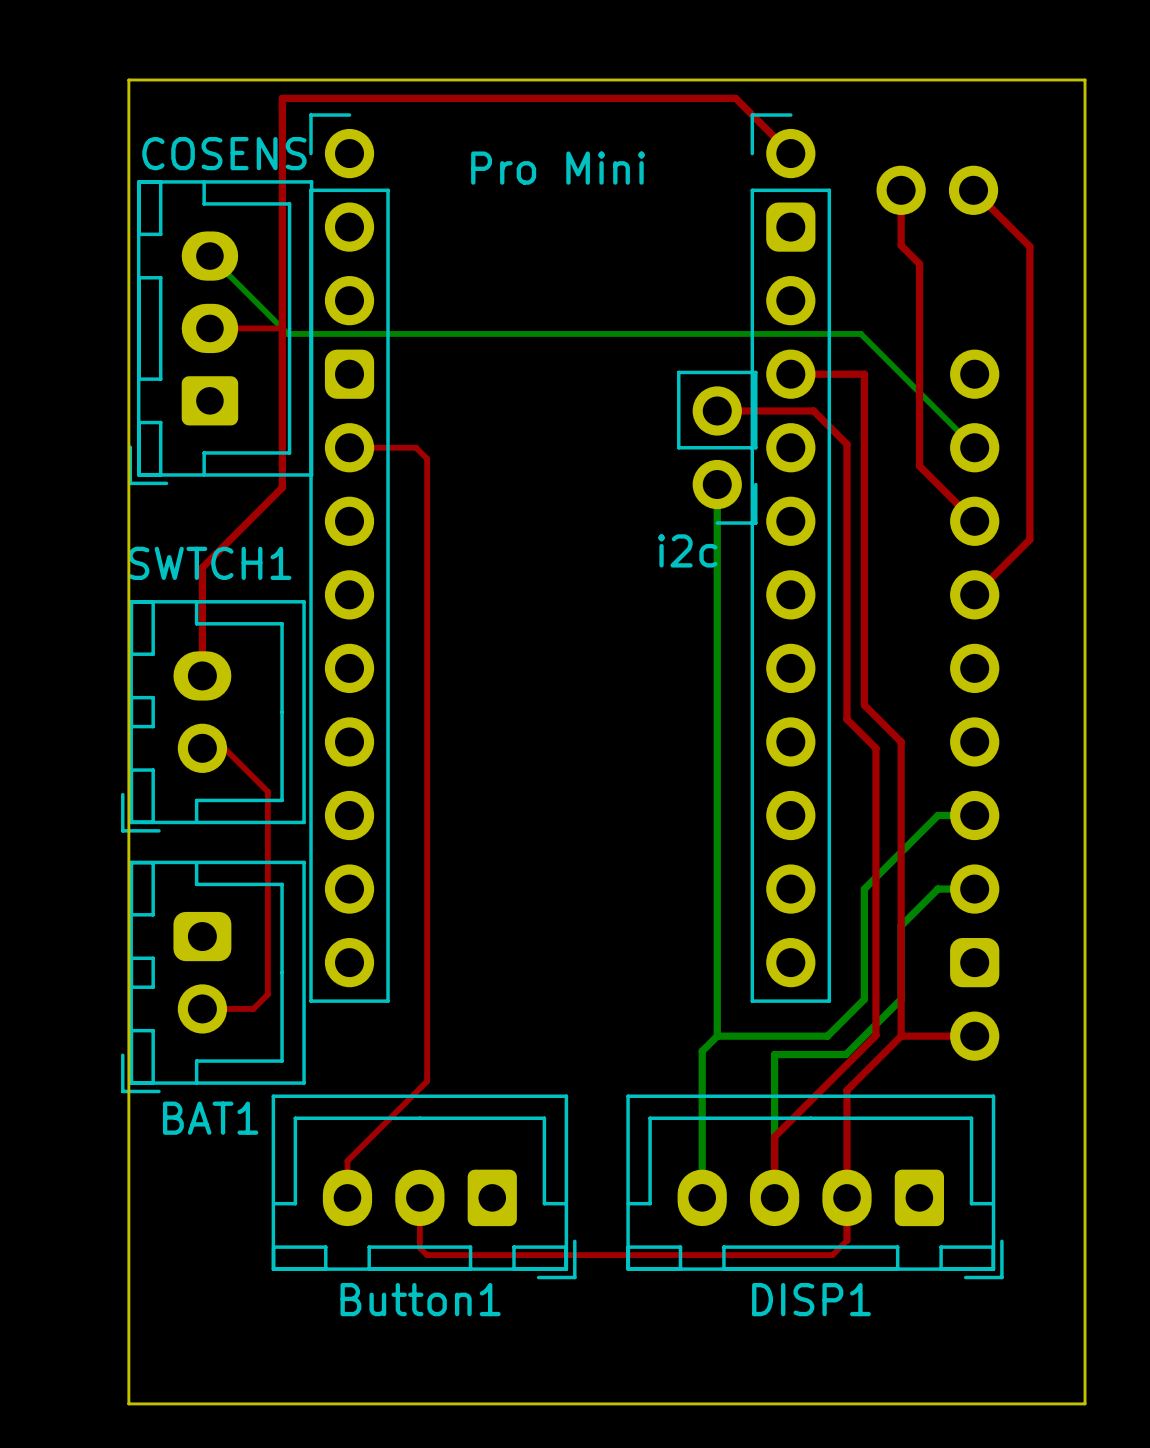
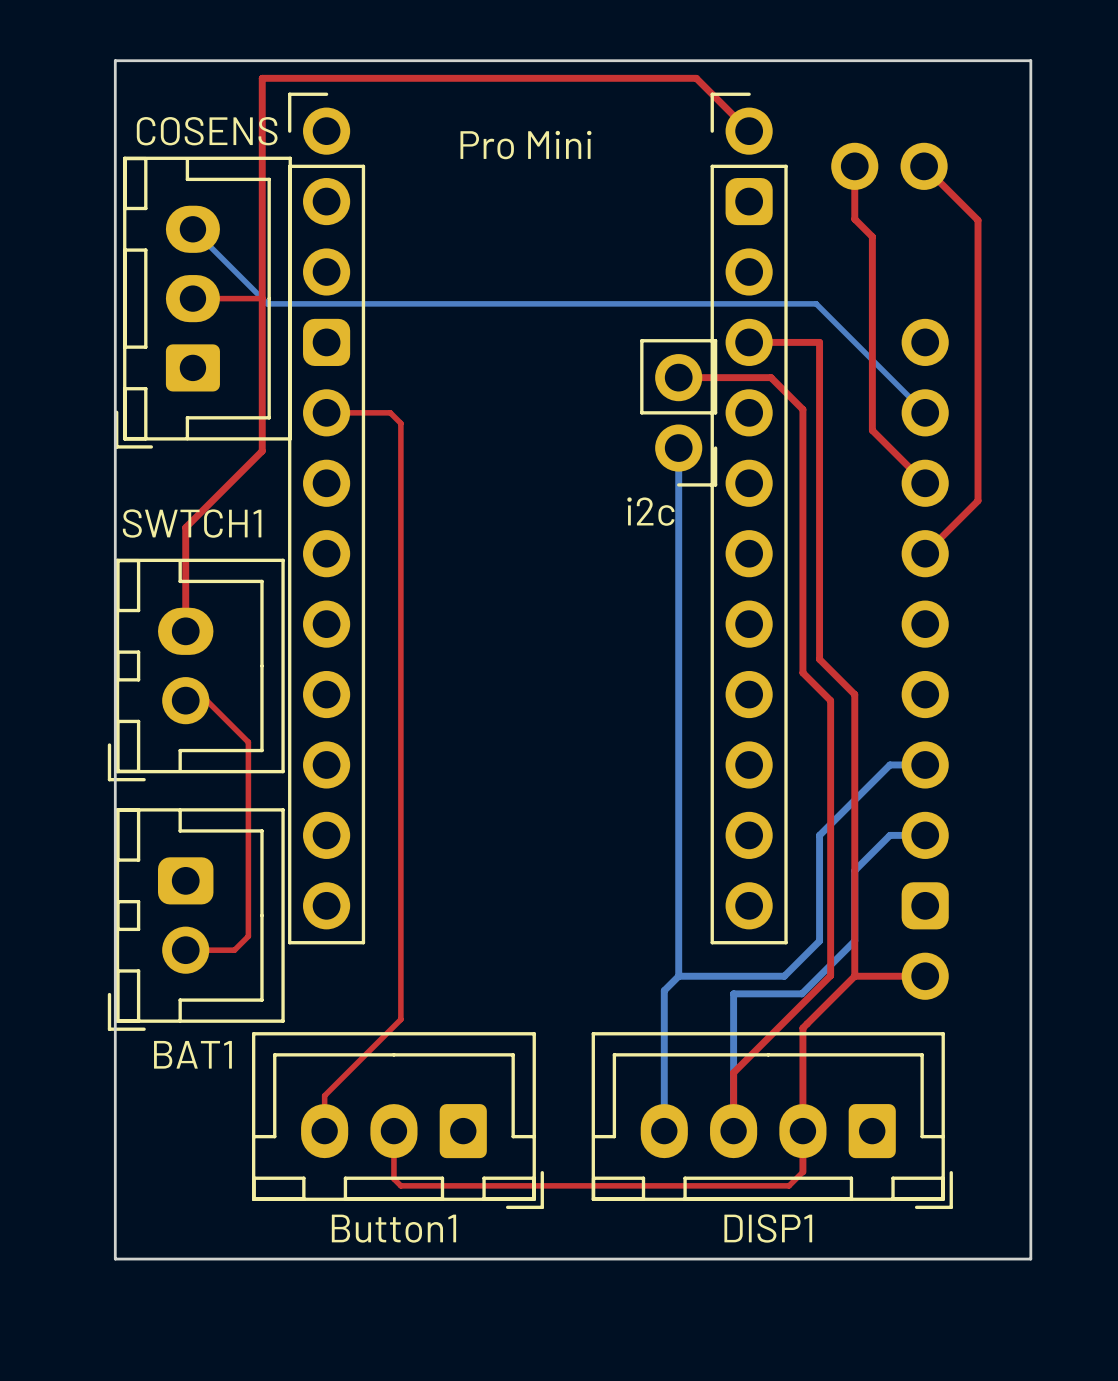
board edge: (128, 1331) (128, 1403) (1085, 1403) (1085, 1331) -> (115, 1259) (1030, 1259)

